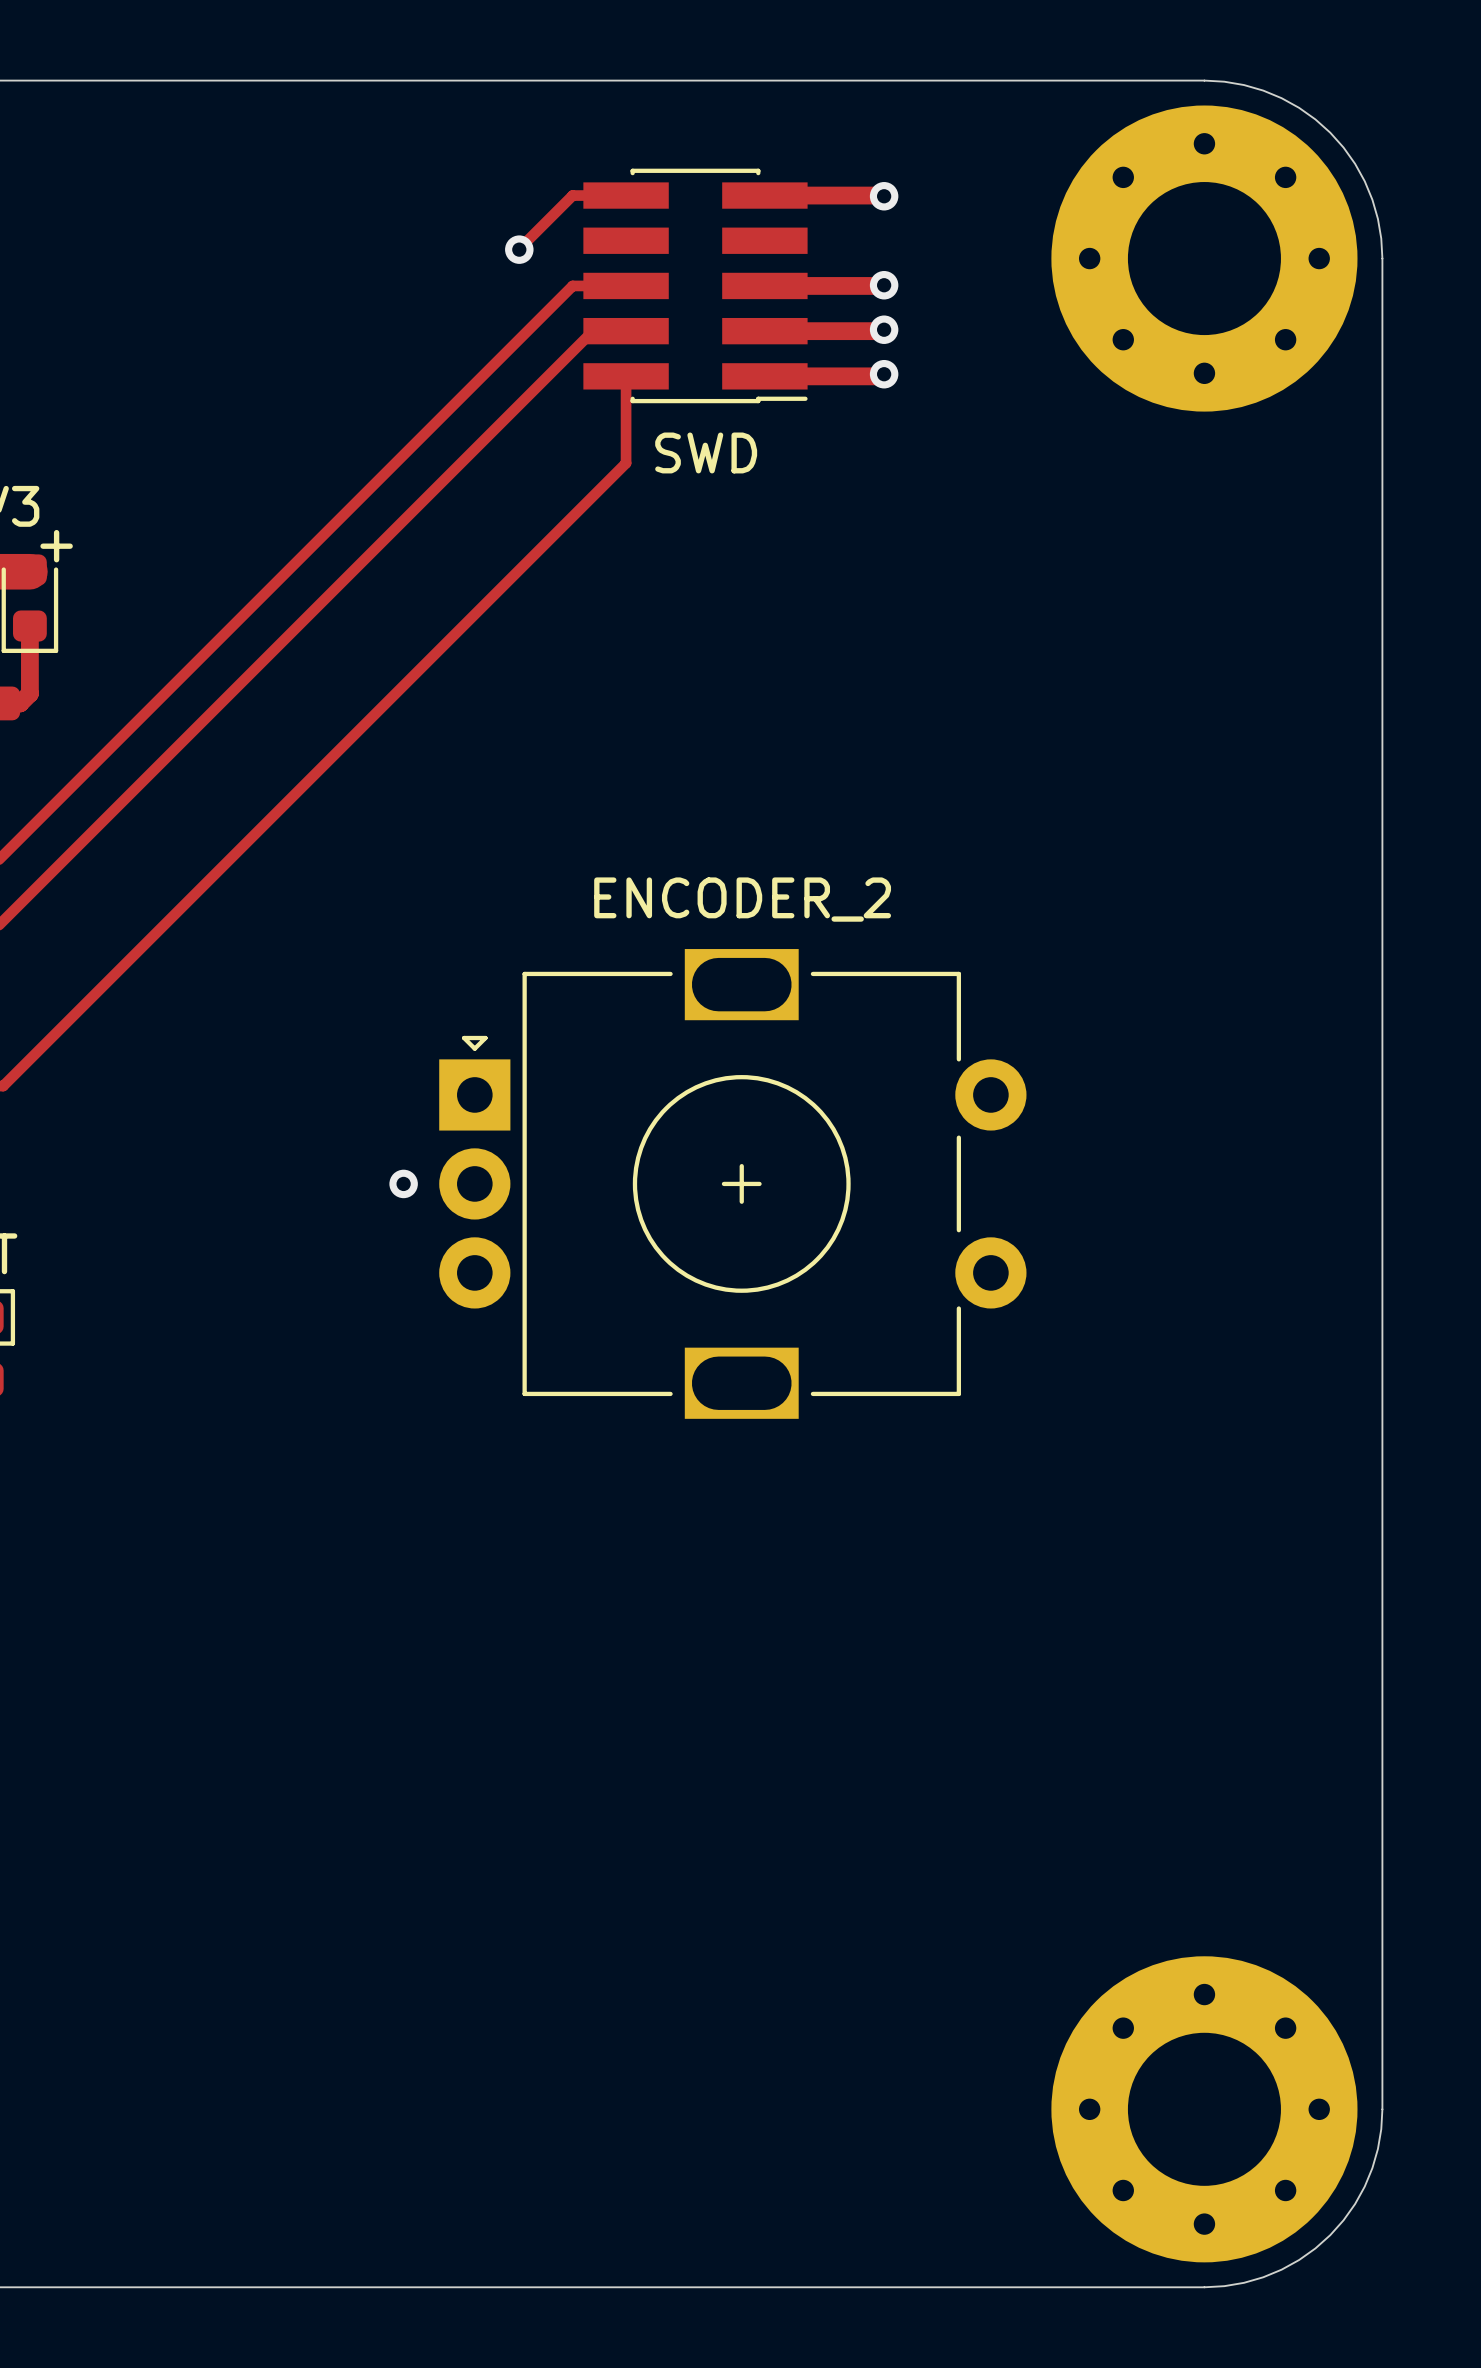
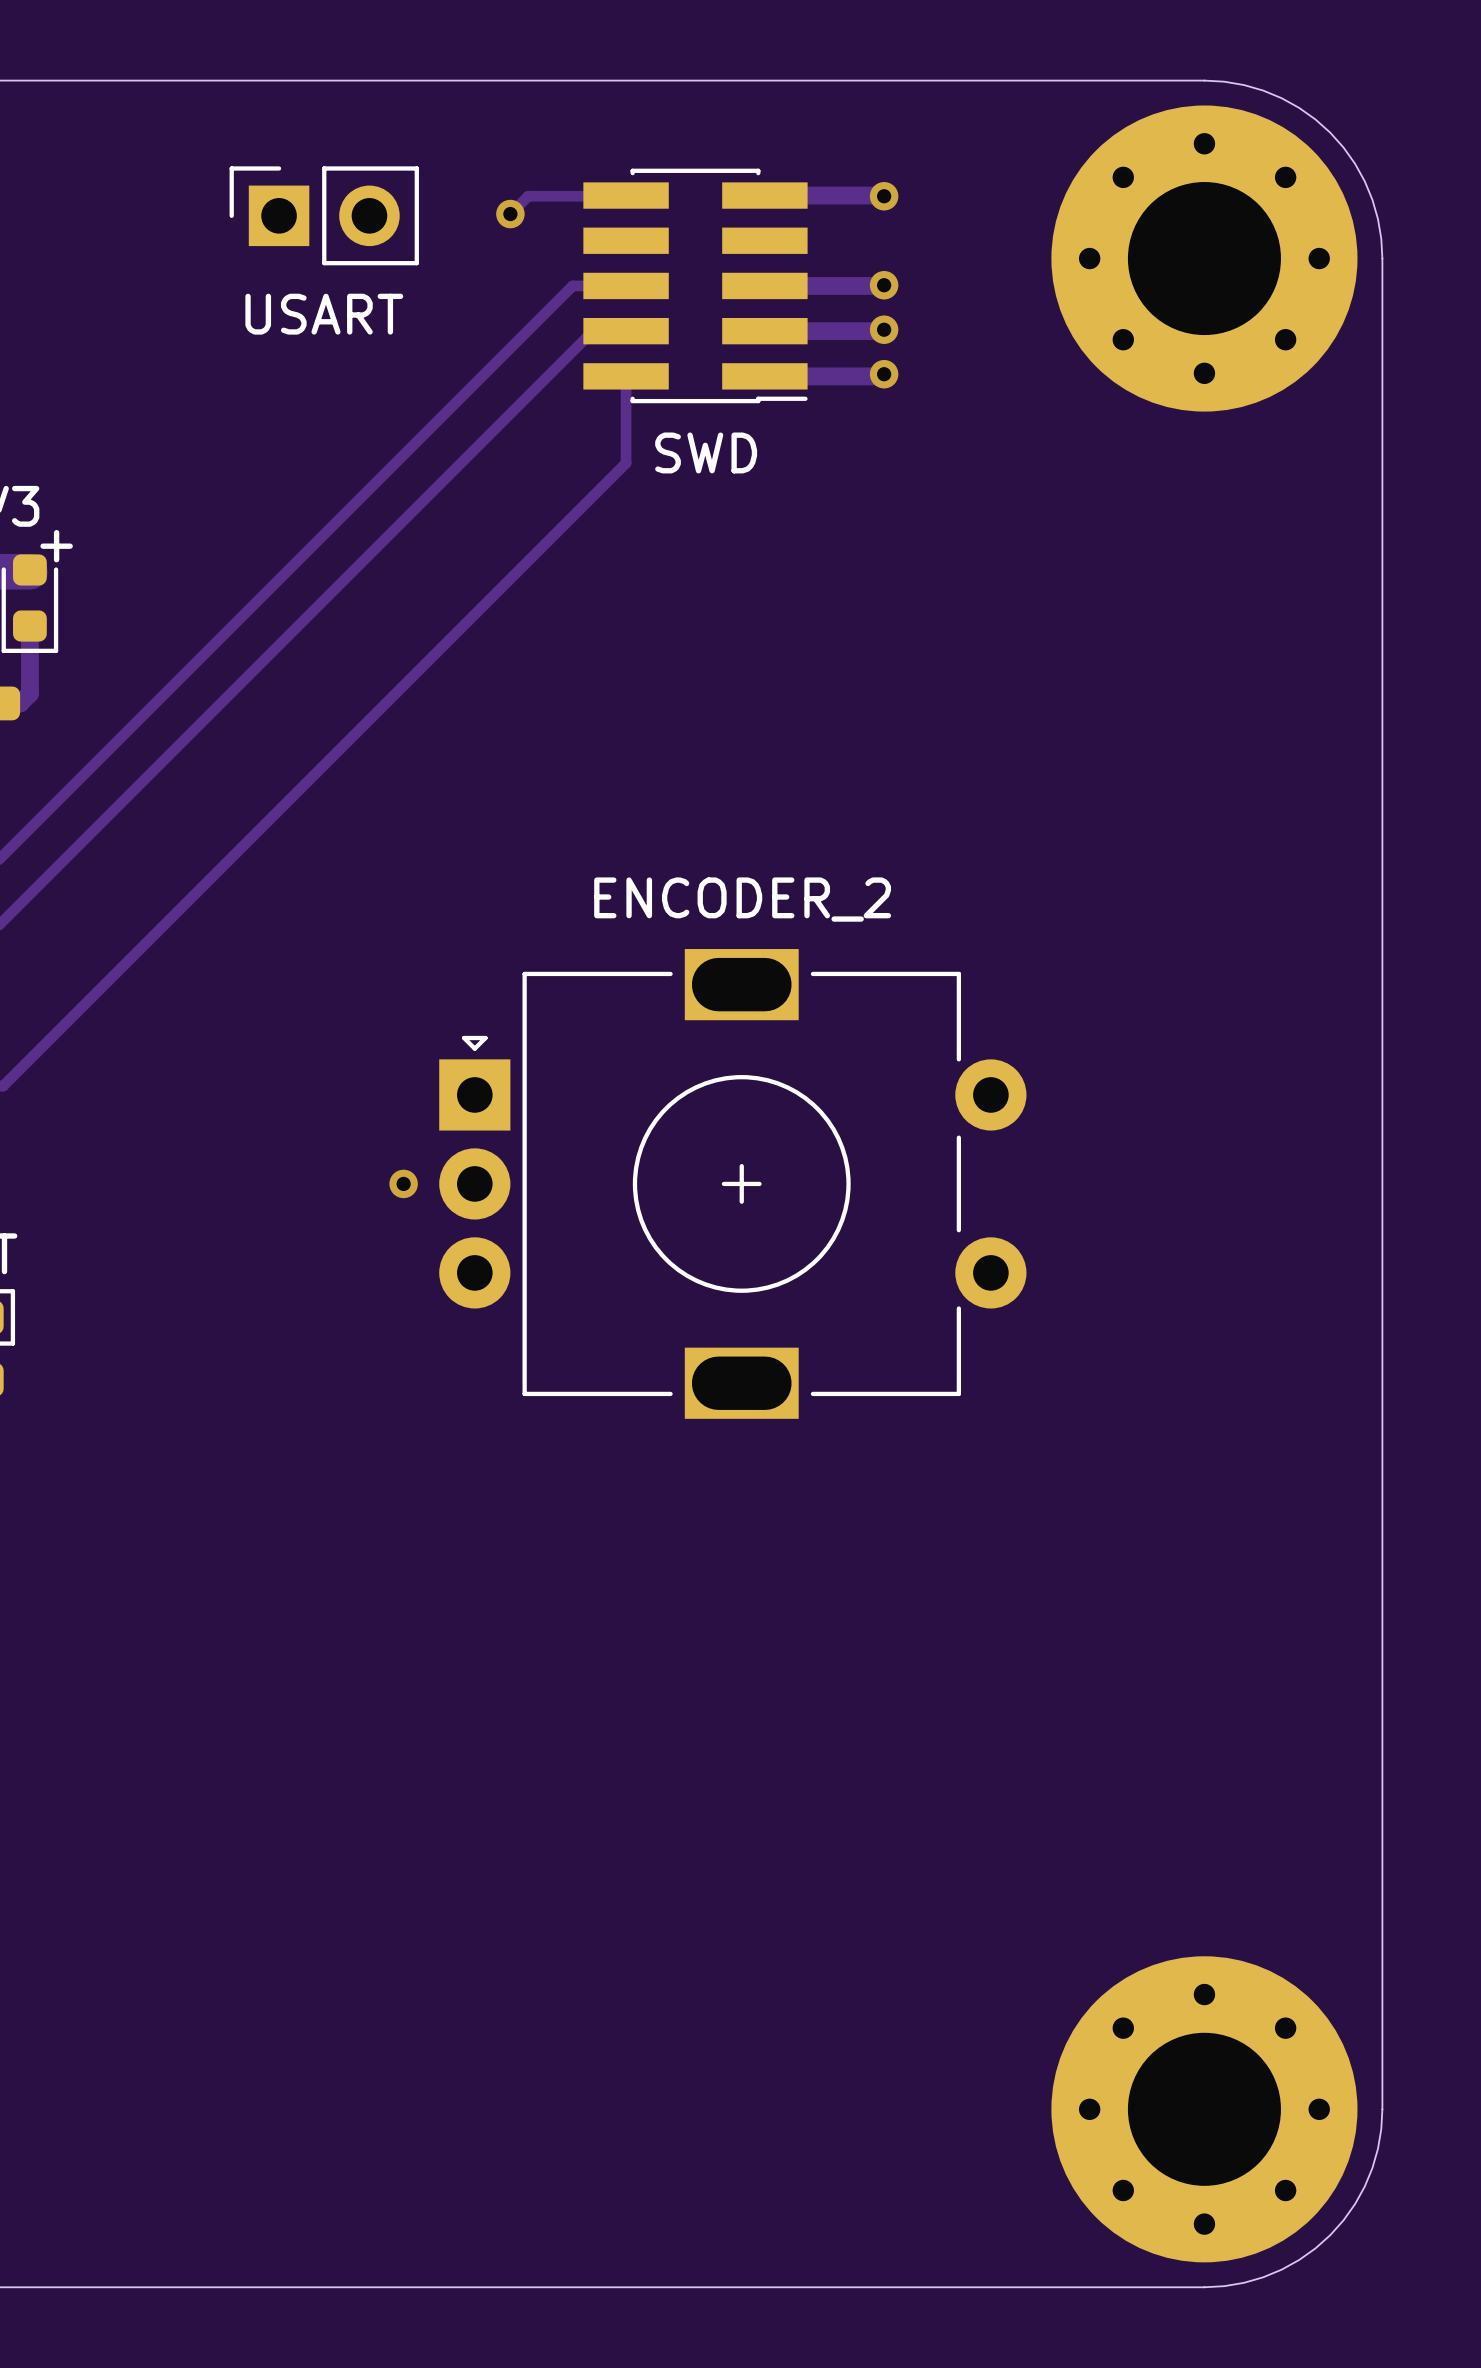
track: (626, 195) (572, 195) (519, 248) -> none
track: none -> (590, 196) (528, 196) (510, 214)
part: none -> (324, 215)
via position: (519, 249) -> (510, 214)
text: none -> USART (324, 314)

